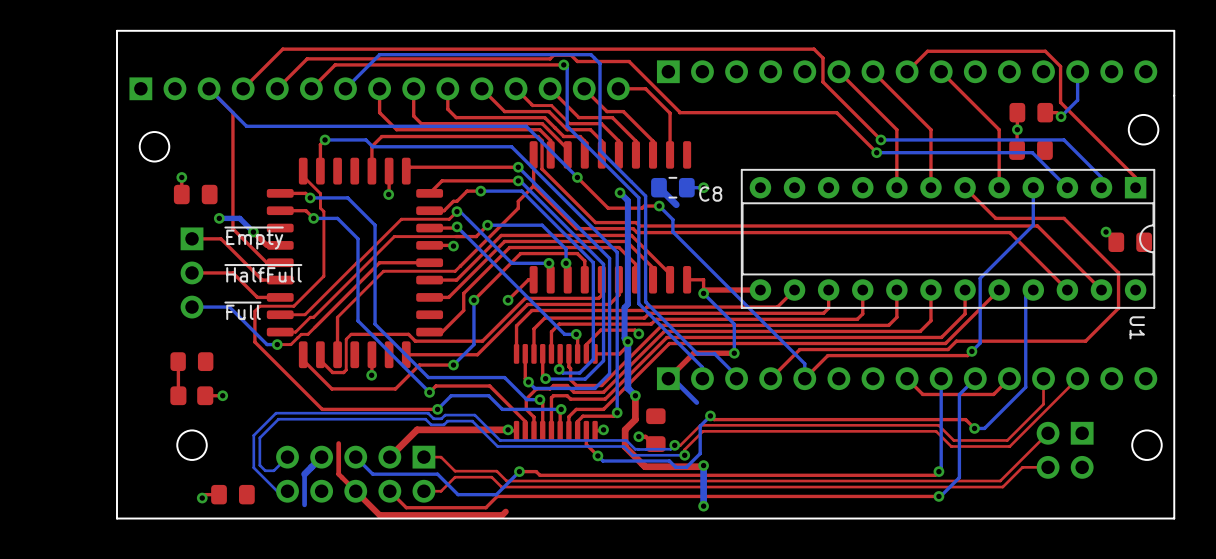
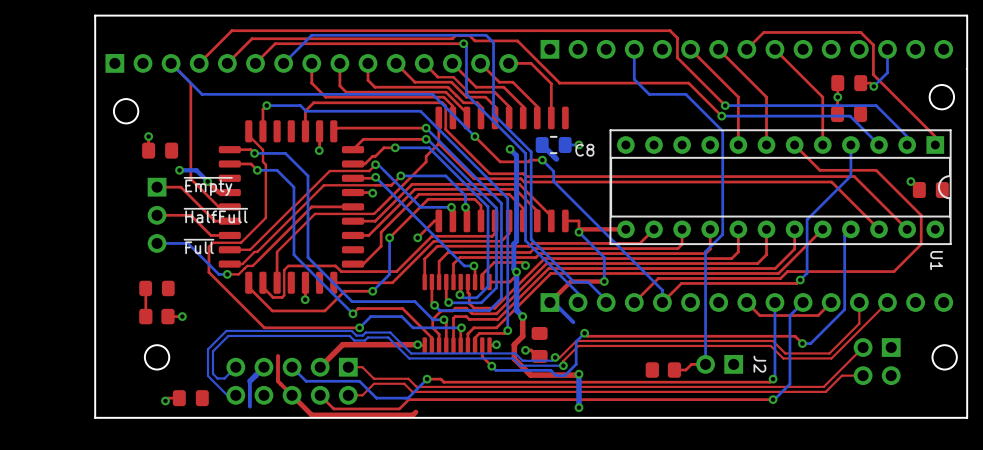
bottom track: none -> (634, 49) (634, 79) (649, 94) (685, 94) (722, 131) (722, 234) (705, 251) (705, 364)
top track: none -> (705, 364) (691, 364) (685, 370) (674, 370)
J2: none -> (719, 364)
part: none -> (663, 370)

